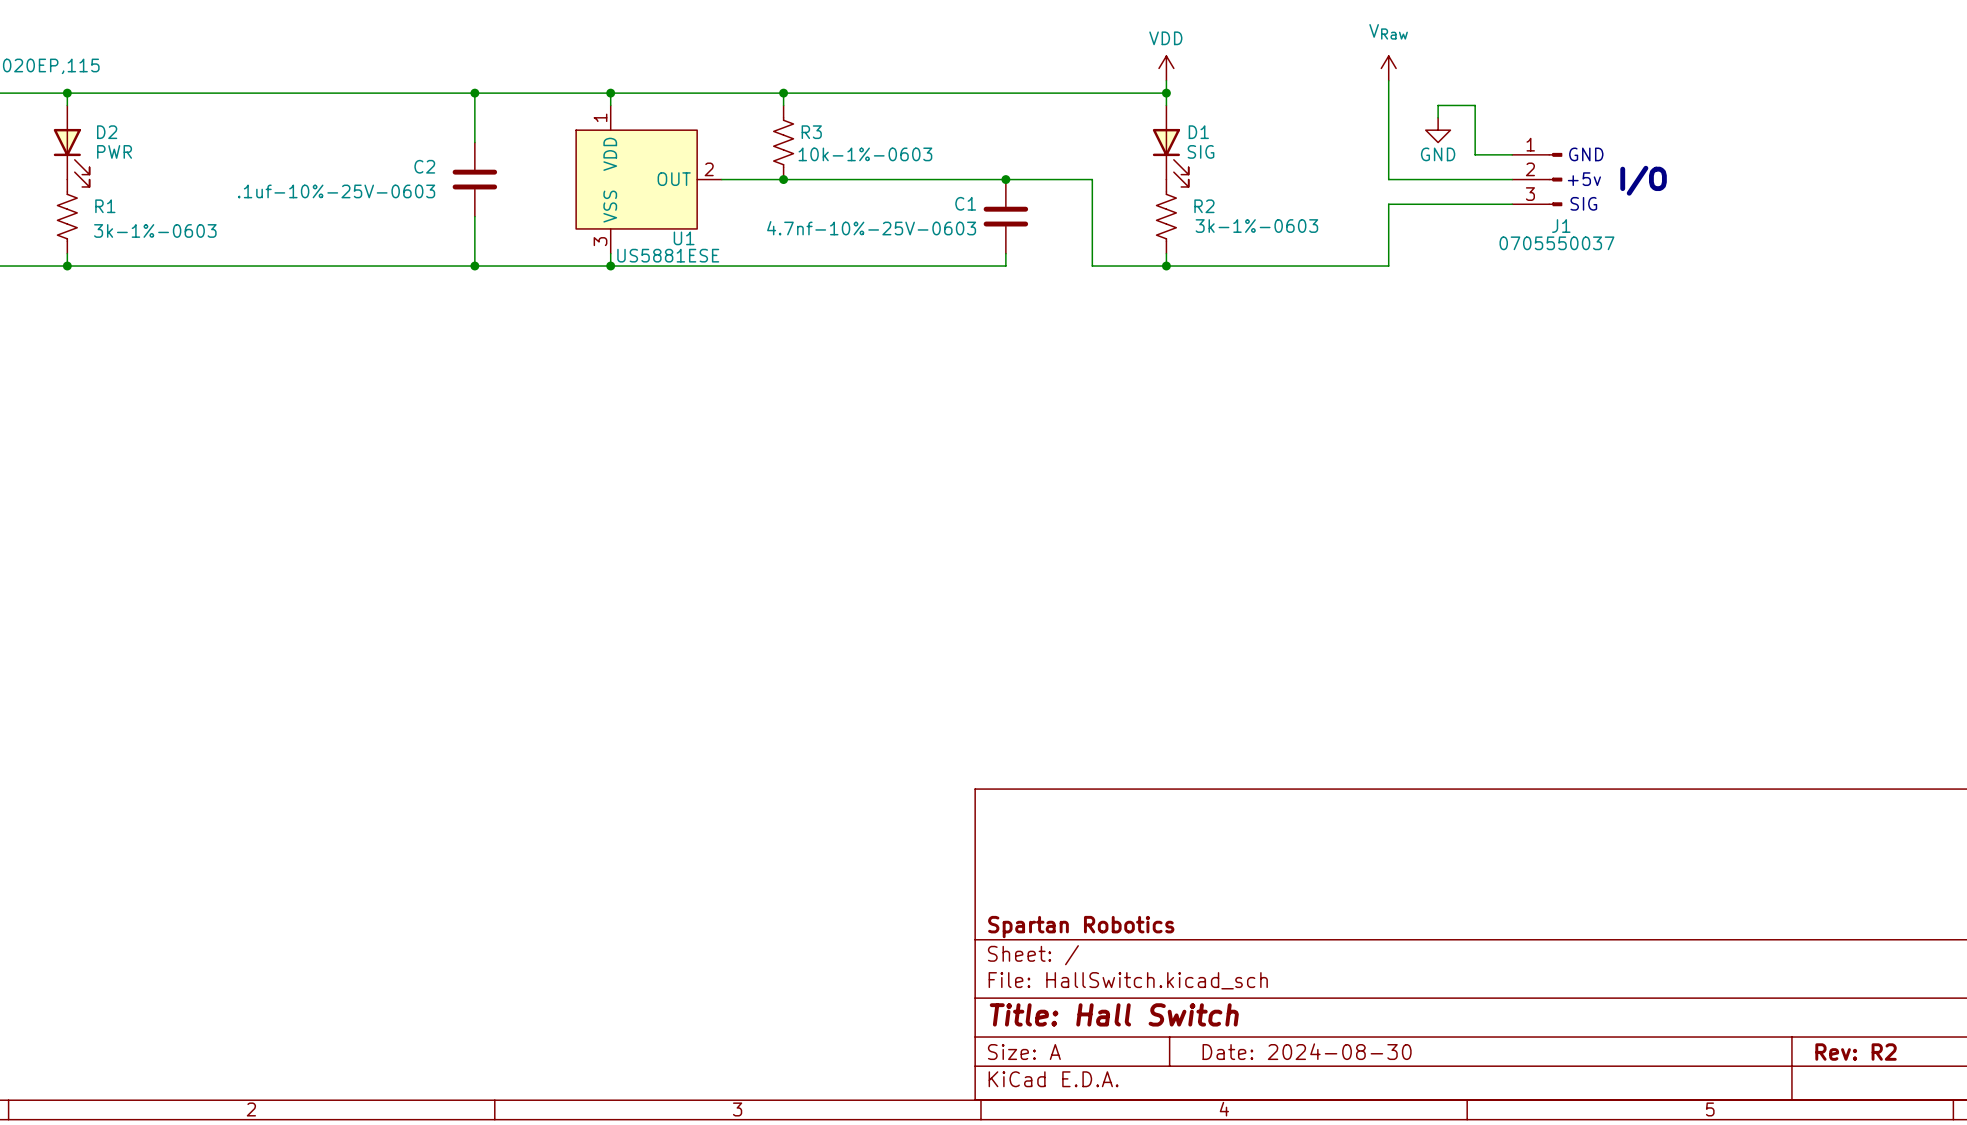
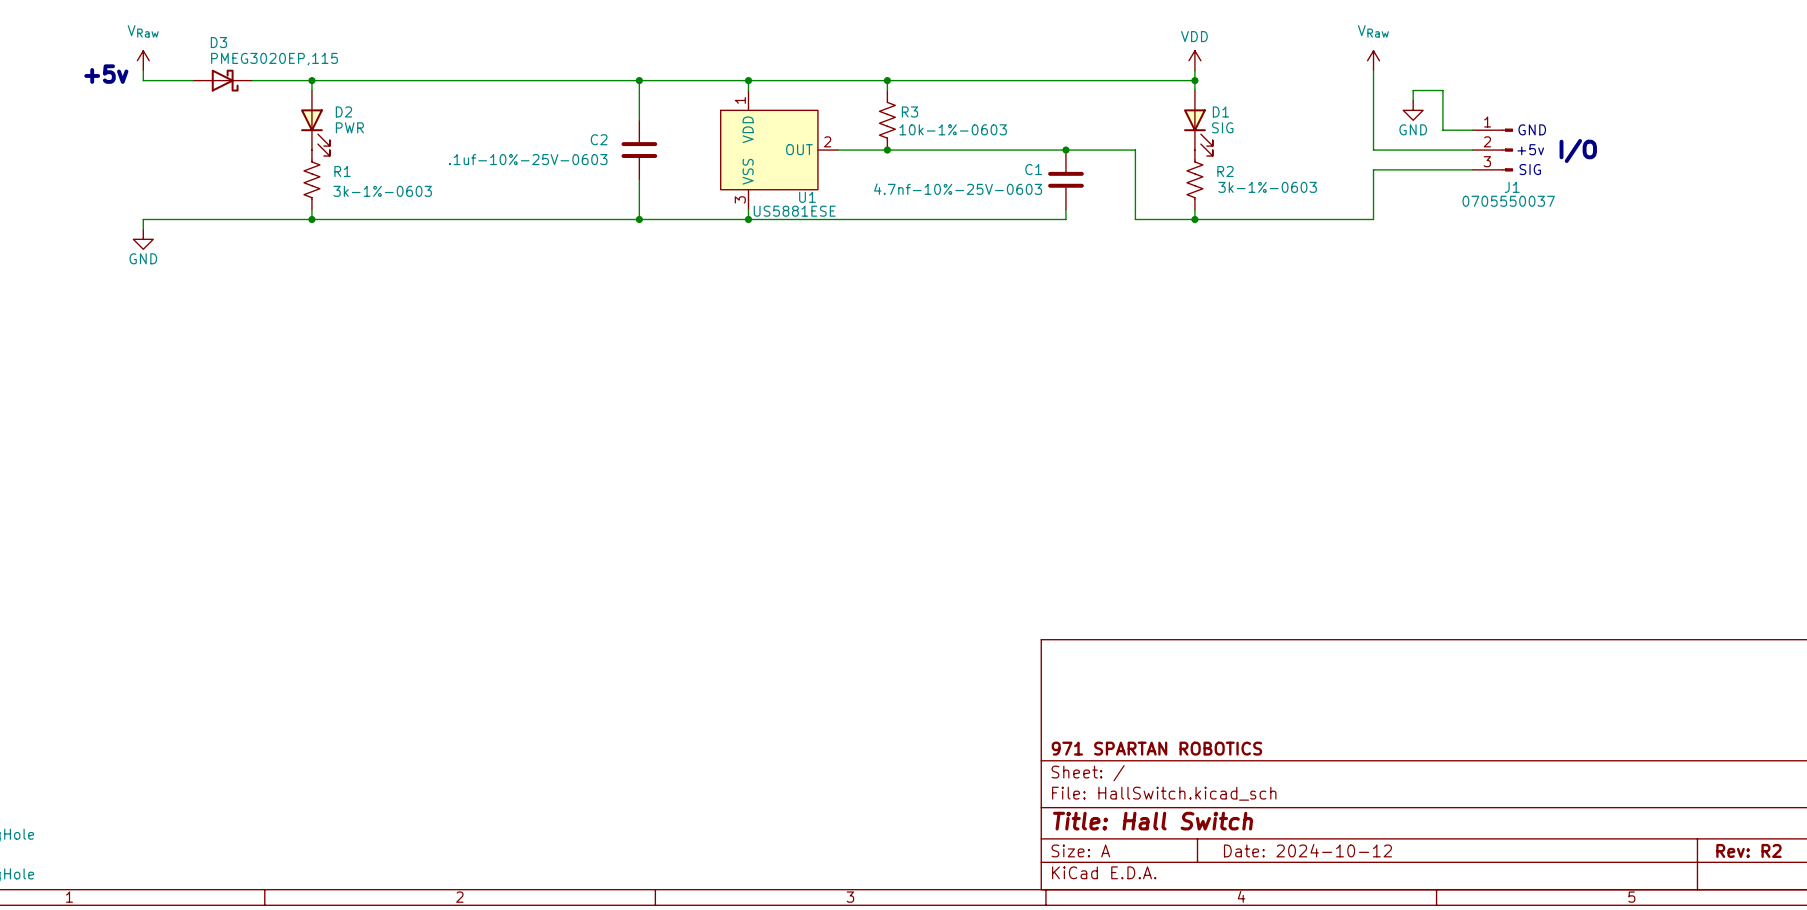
title block: Spartan Robotics (1081, 927) -> 971 SPARTAN ROBOTICS (1156, 748)
title block: Date: 2024-08-30 (1307, 1051) -> Date: 2024-10-12 (1307, 850)

